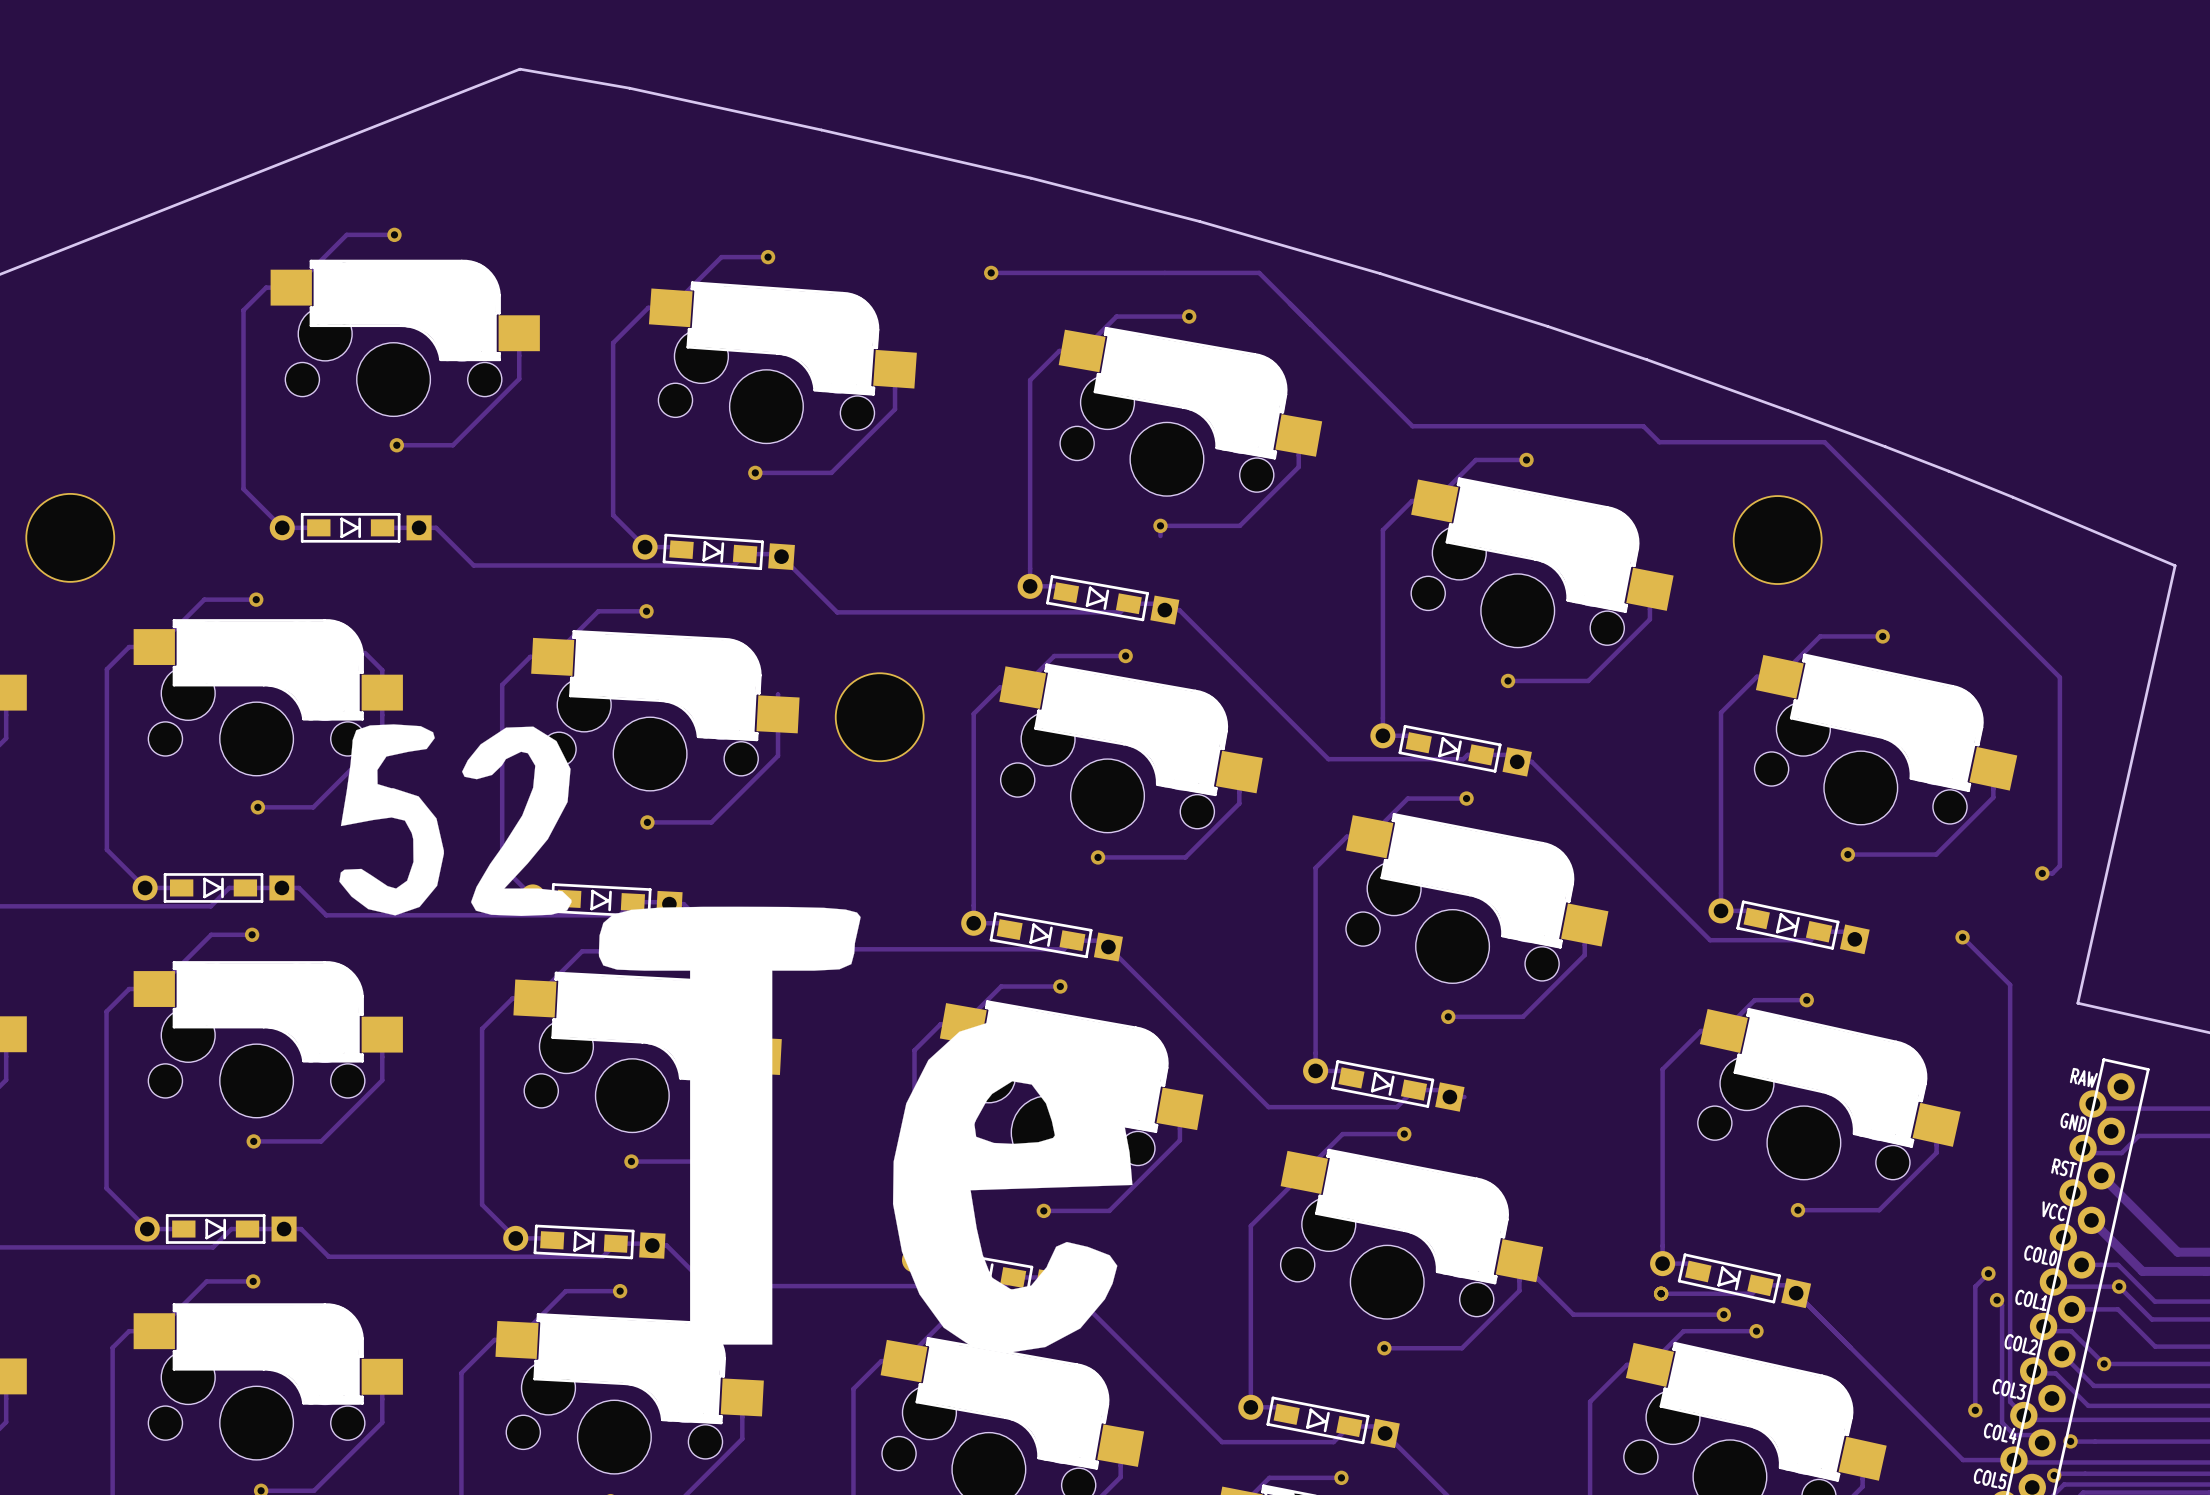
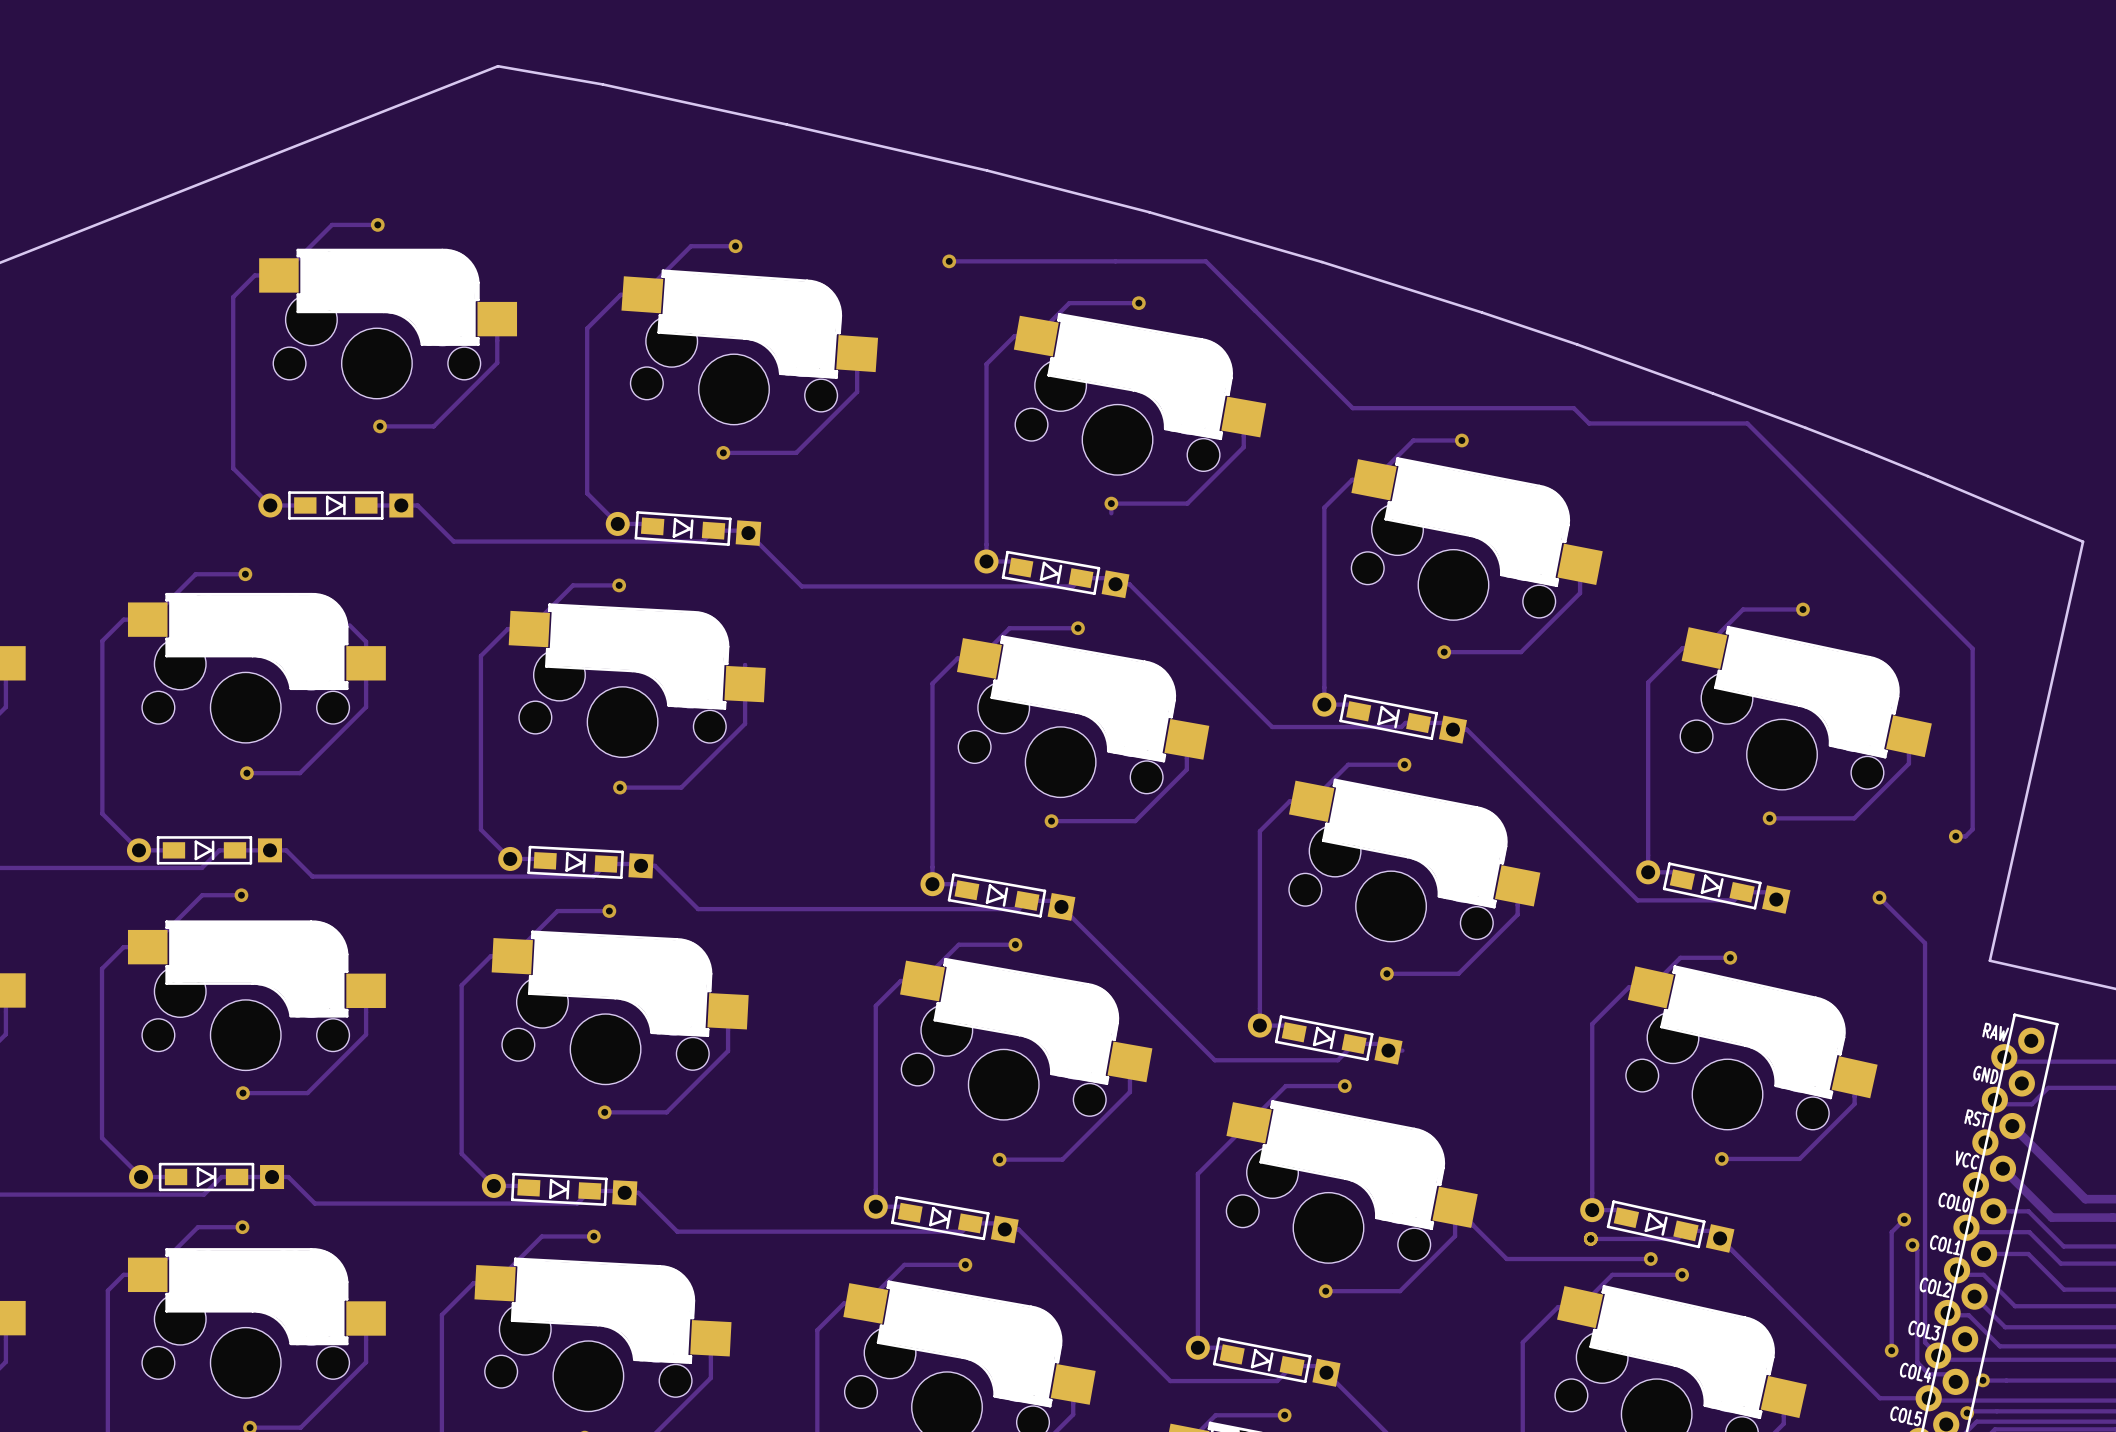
part: (70, 537) -> none
part: (1777, 540) -> none
part: (879, 717) -> none
drawing: [339, 724, 1133, 1354] -> none
via: (2119, 1286) -> none
via: (2104, 1363) -> none

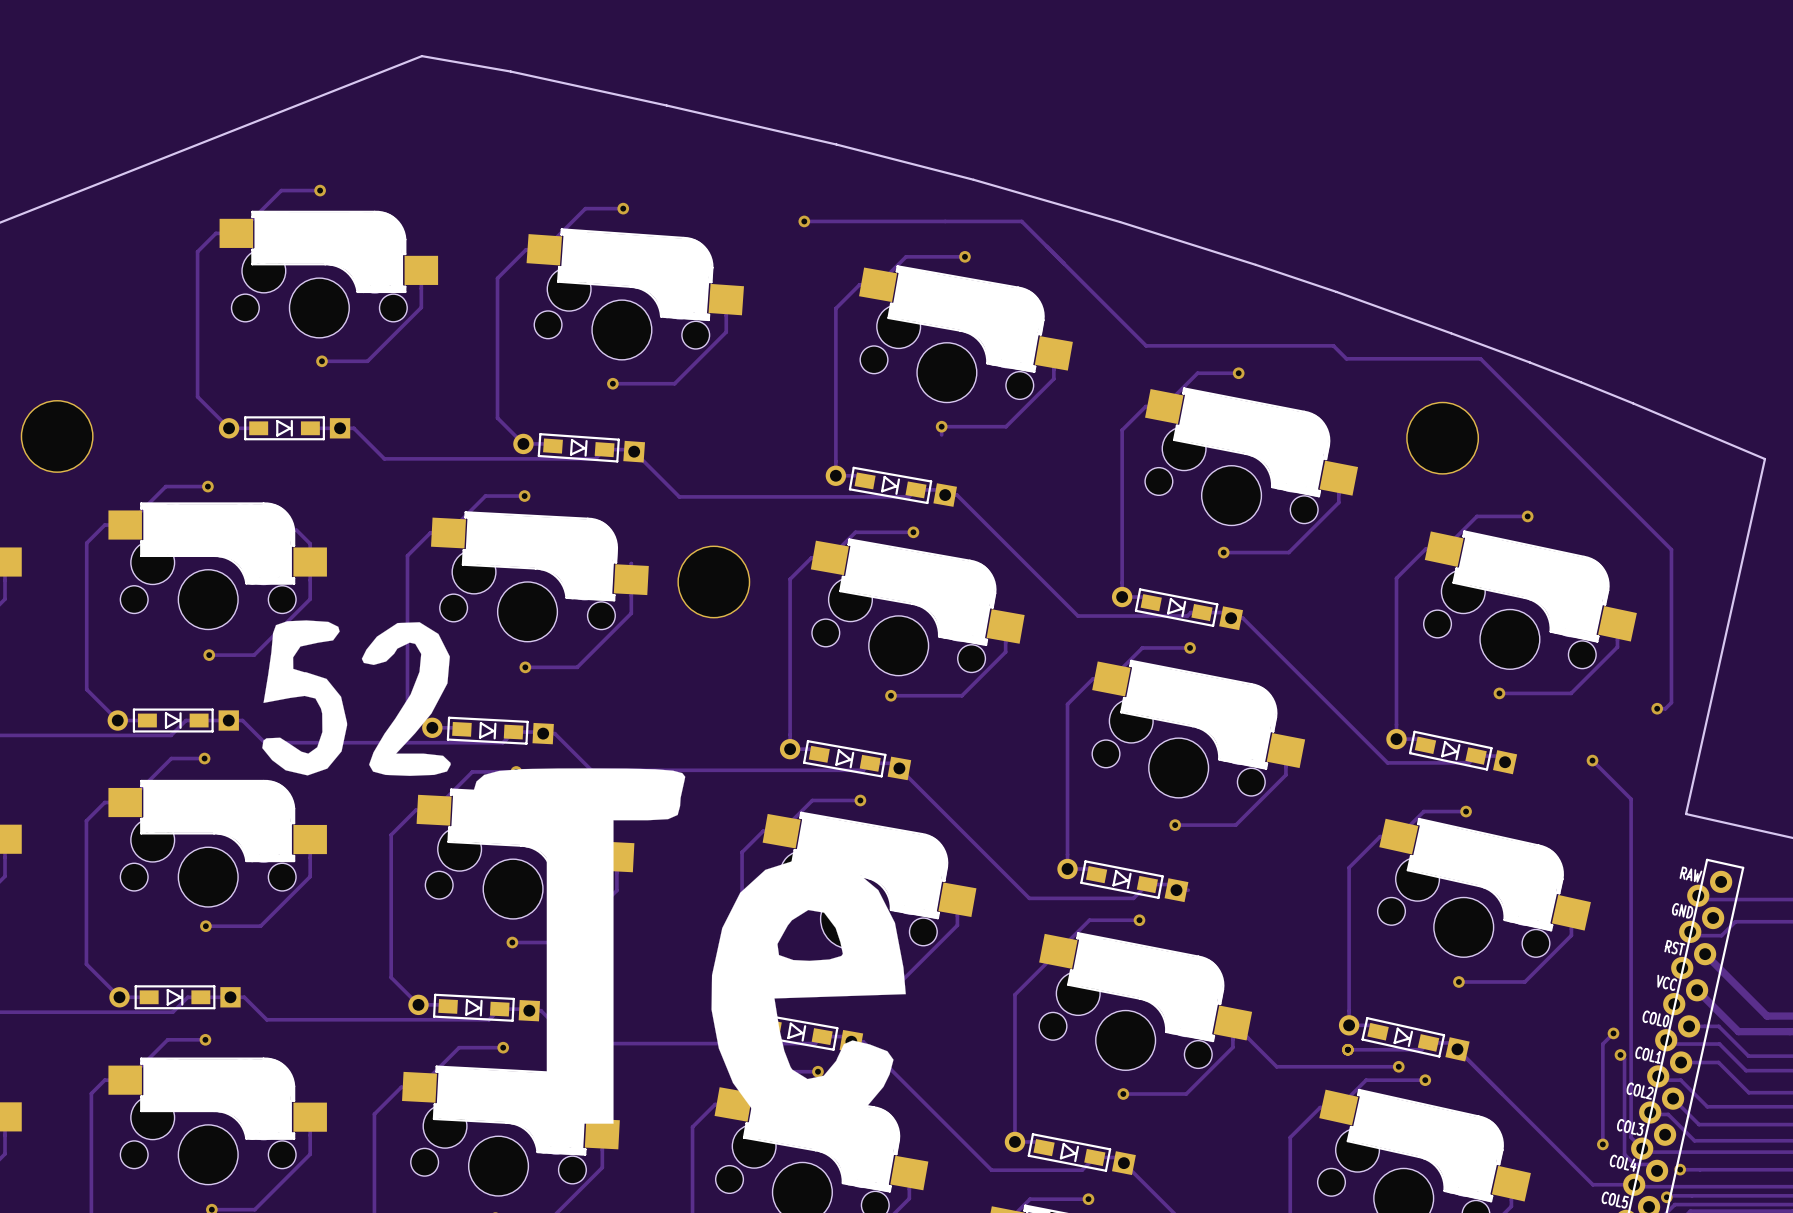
part: none -> (57, 436)
part: none -> (1442, 438)
part: none -> (713, 581)
drawing: none -> [262, 620, 906, 1131]

